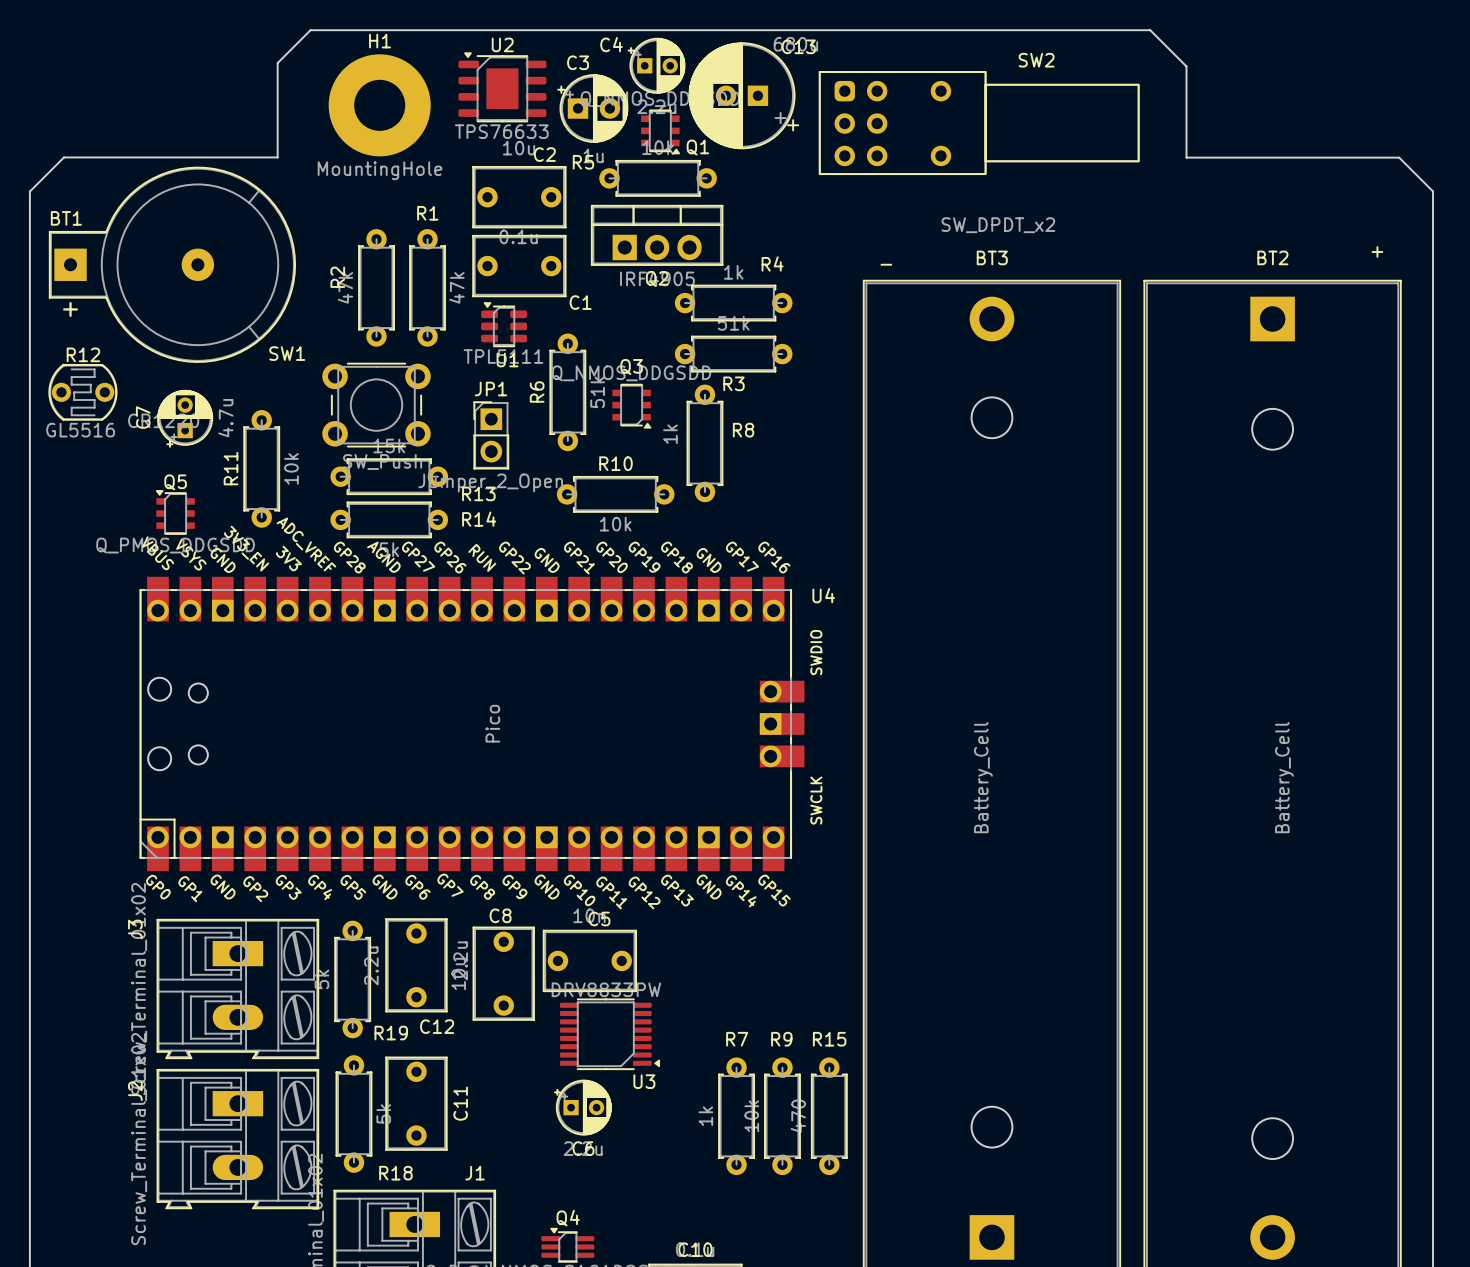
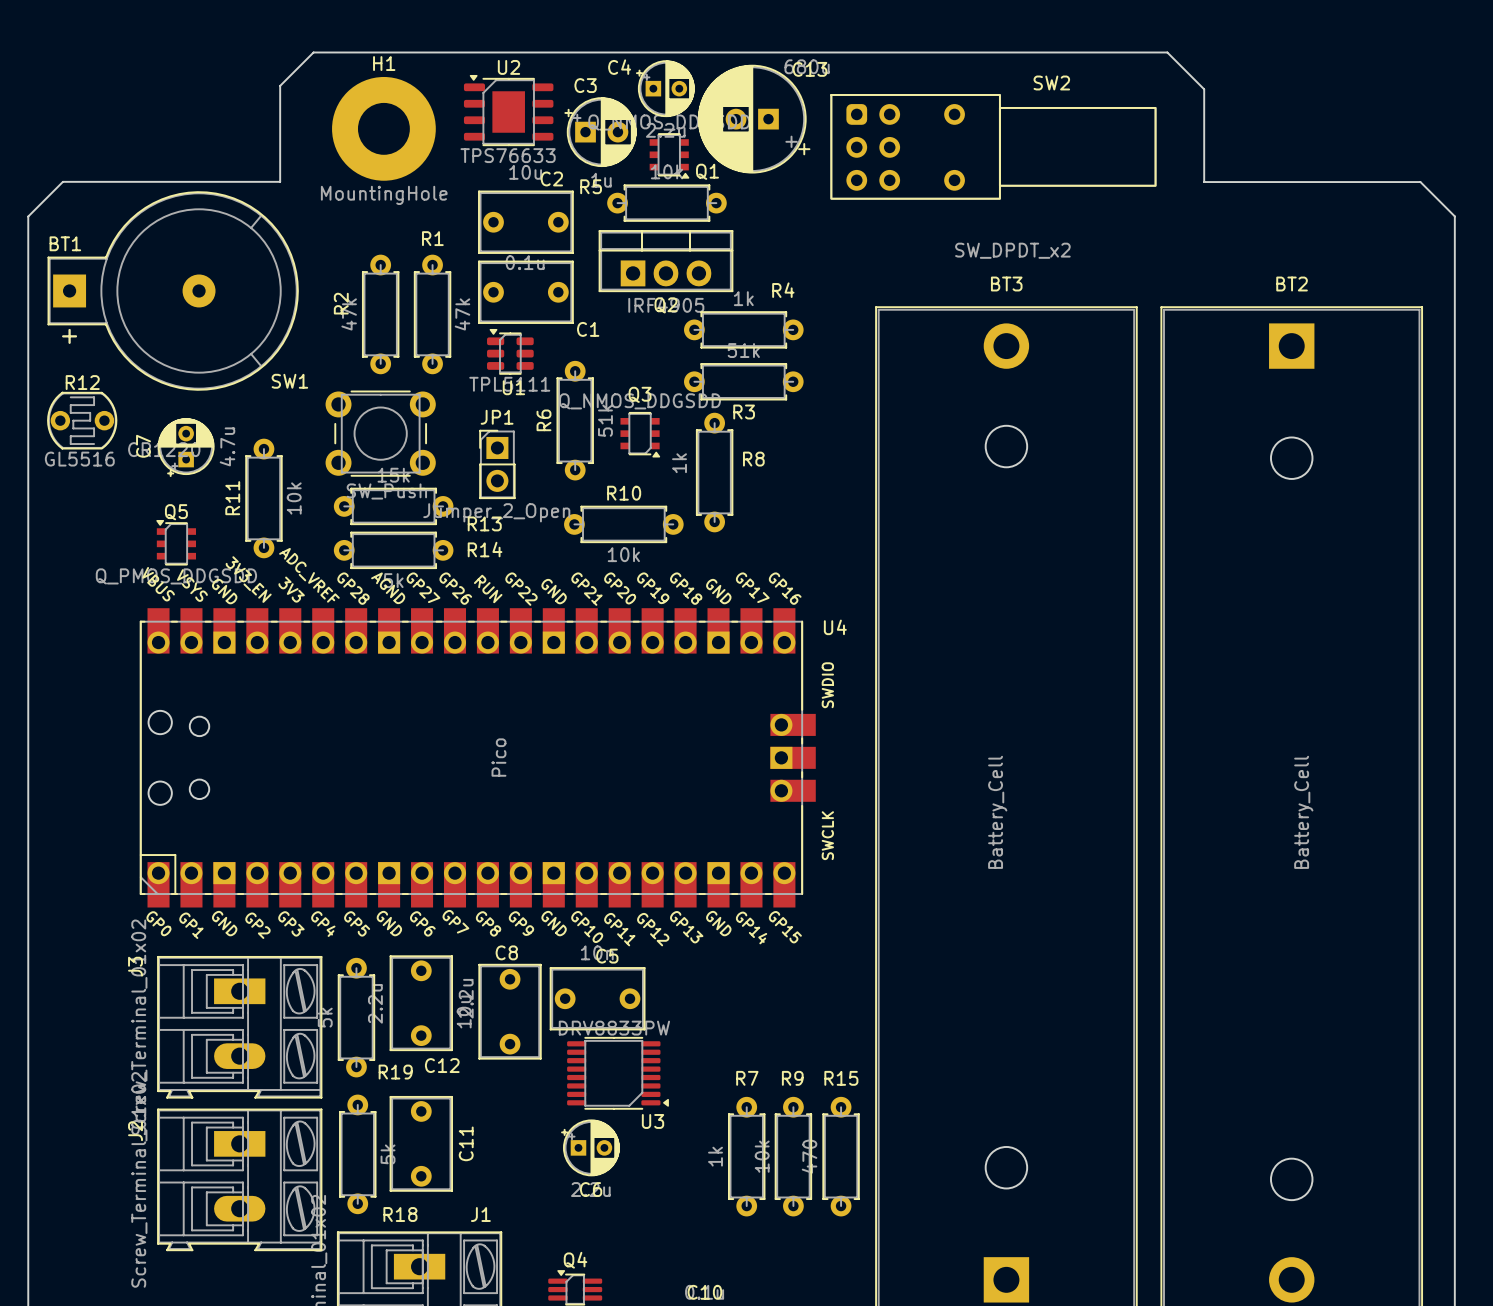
text: + (1377, 251) -> none
text: - (886, 264) -> none

